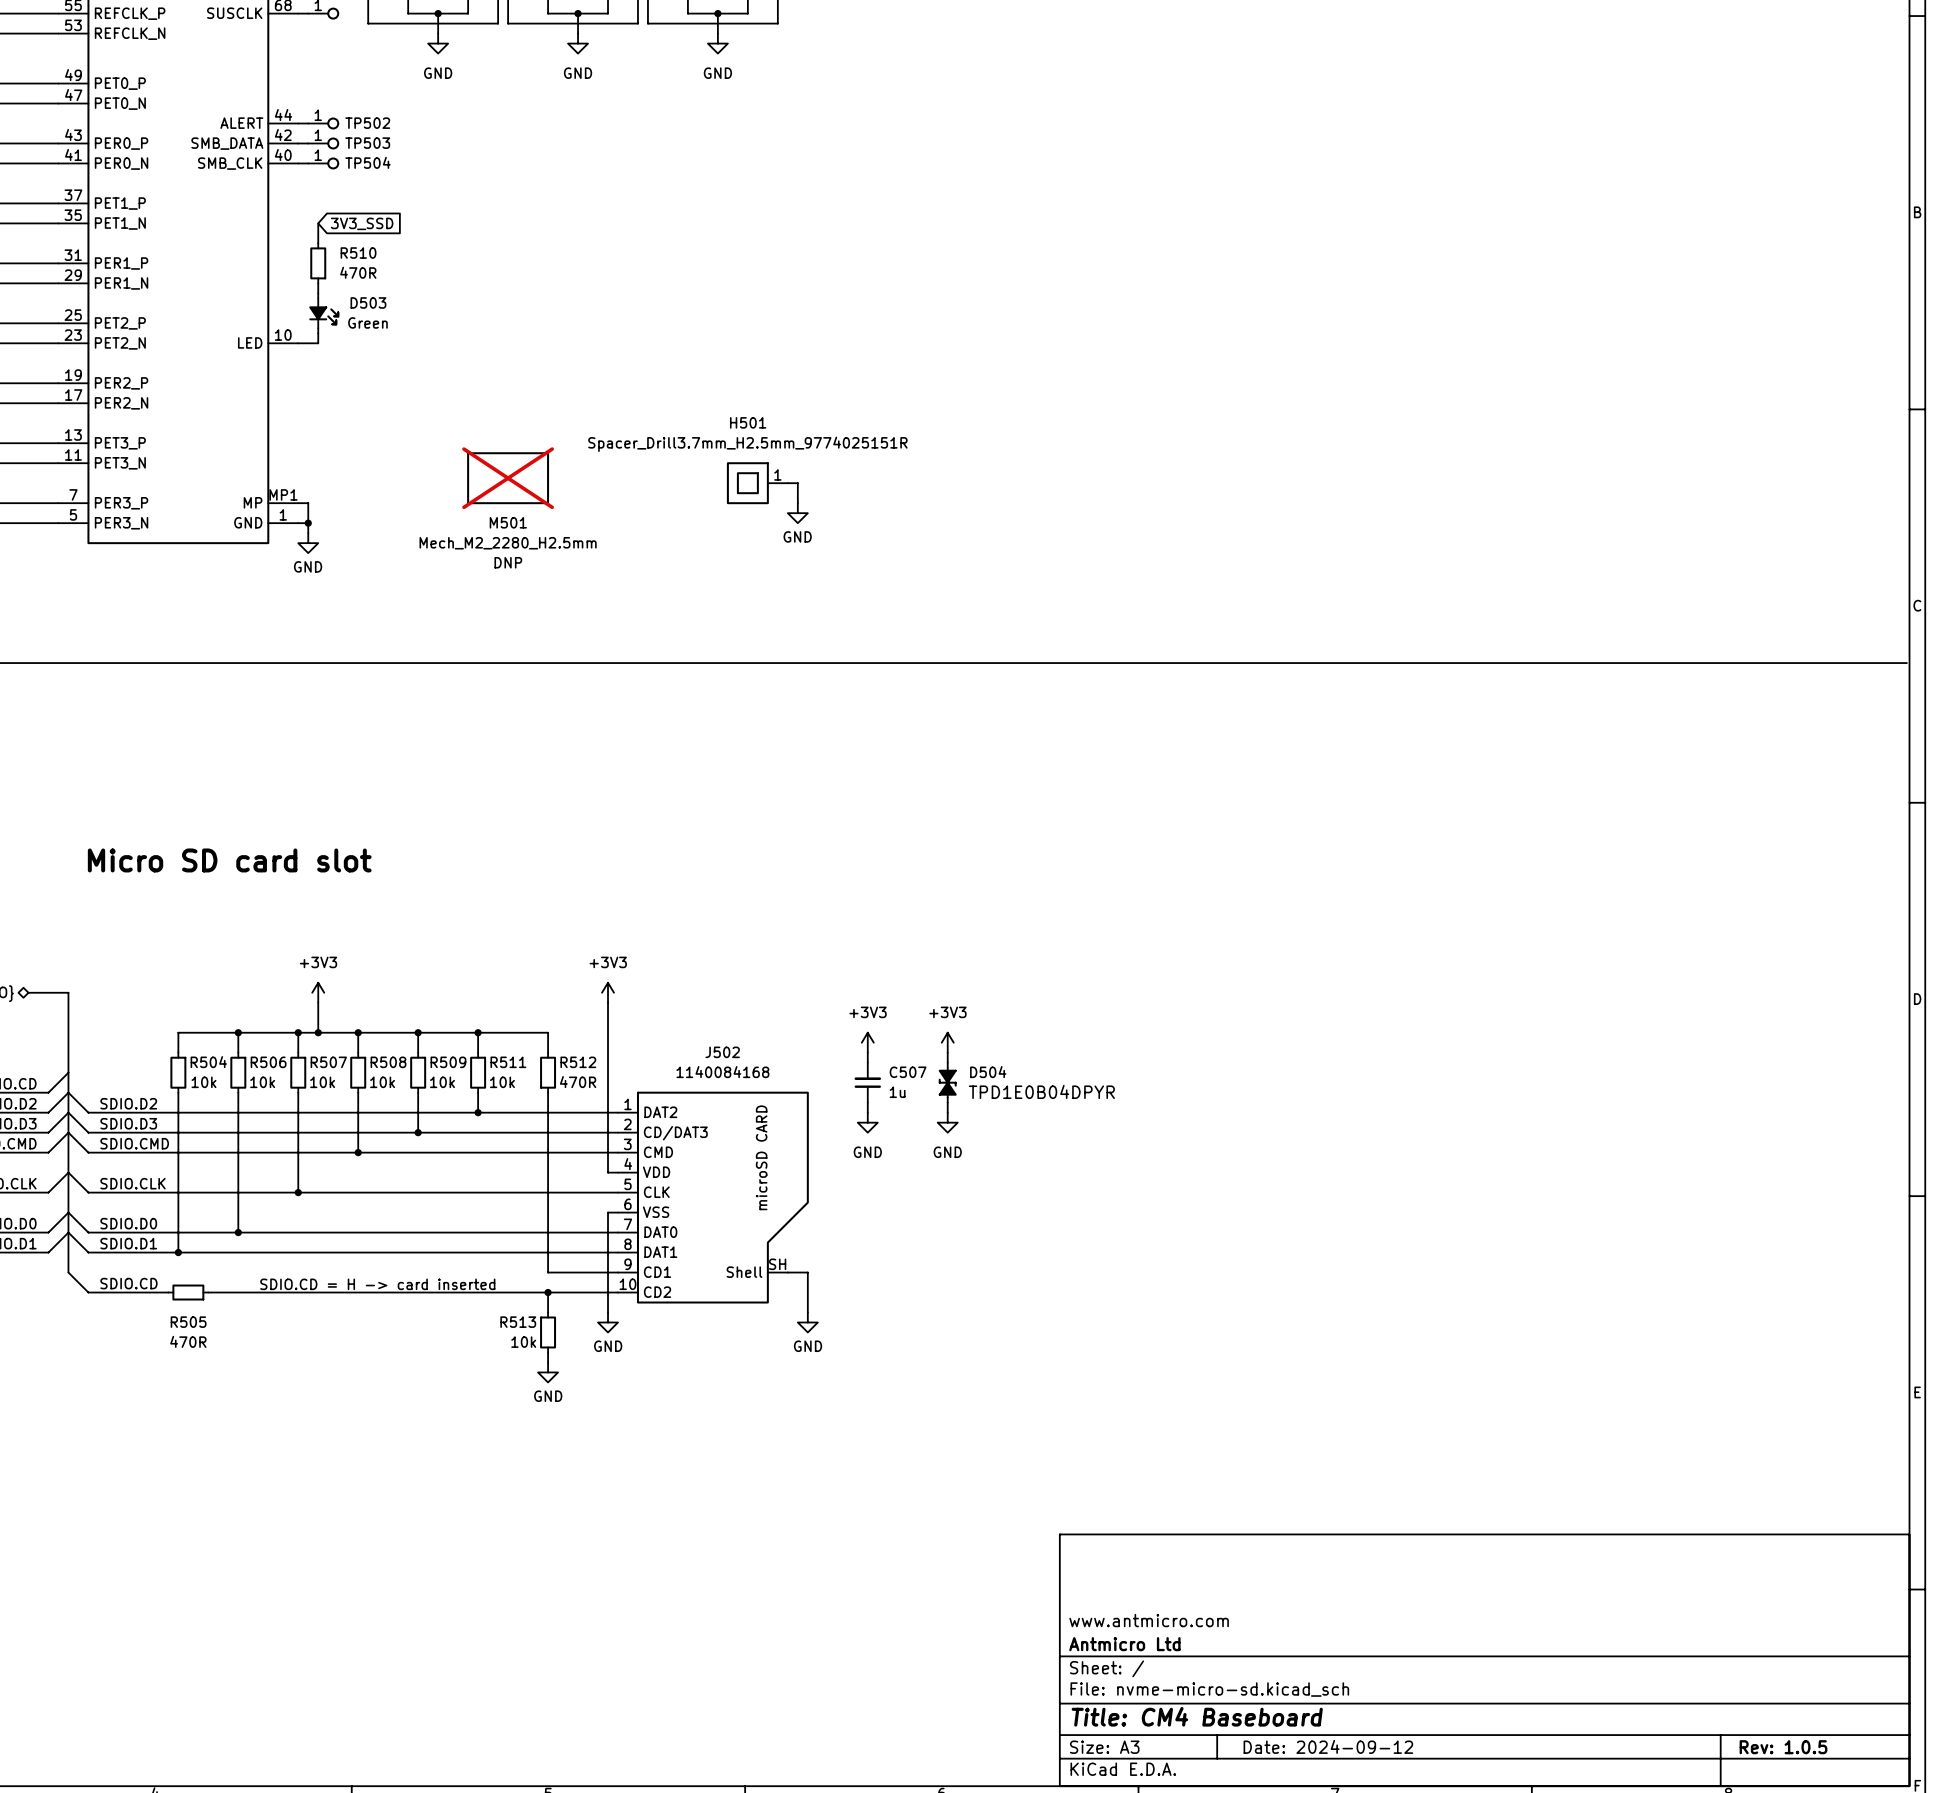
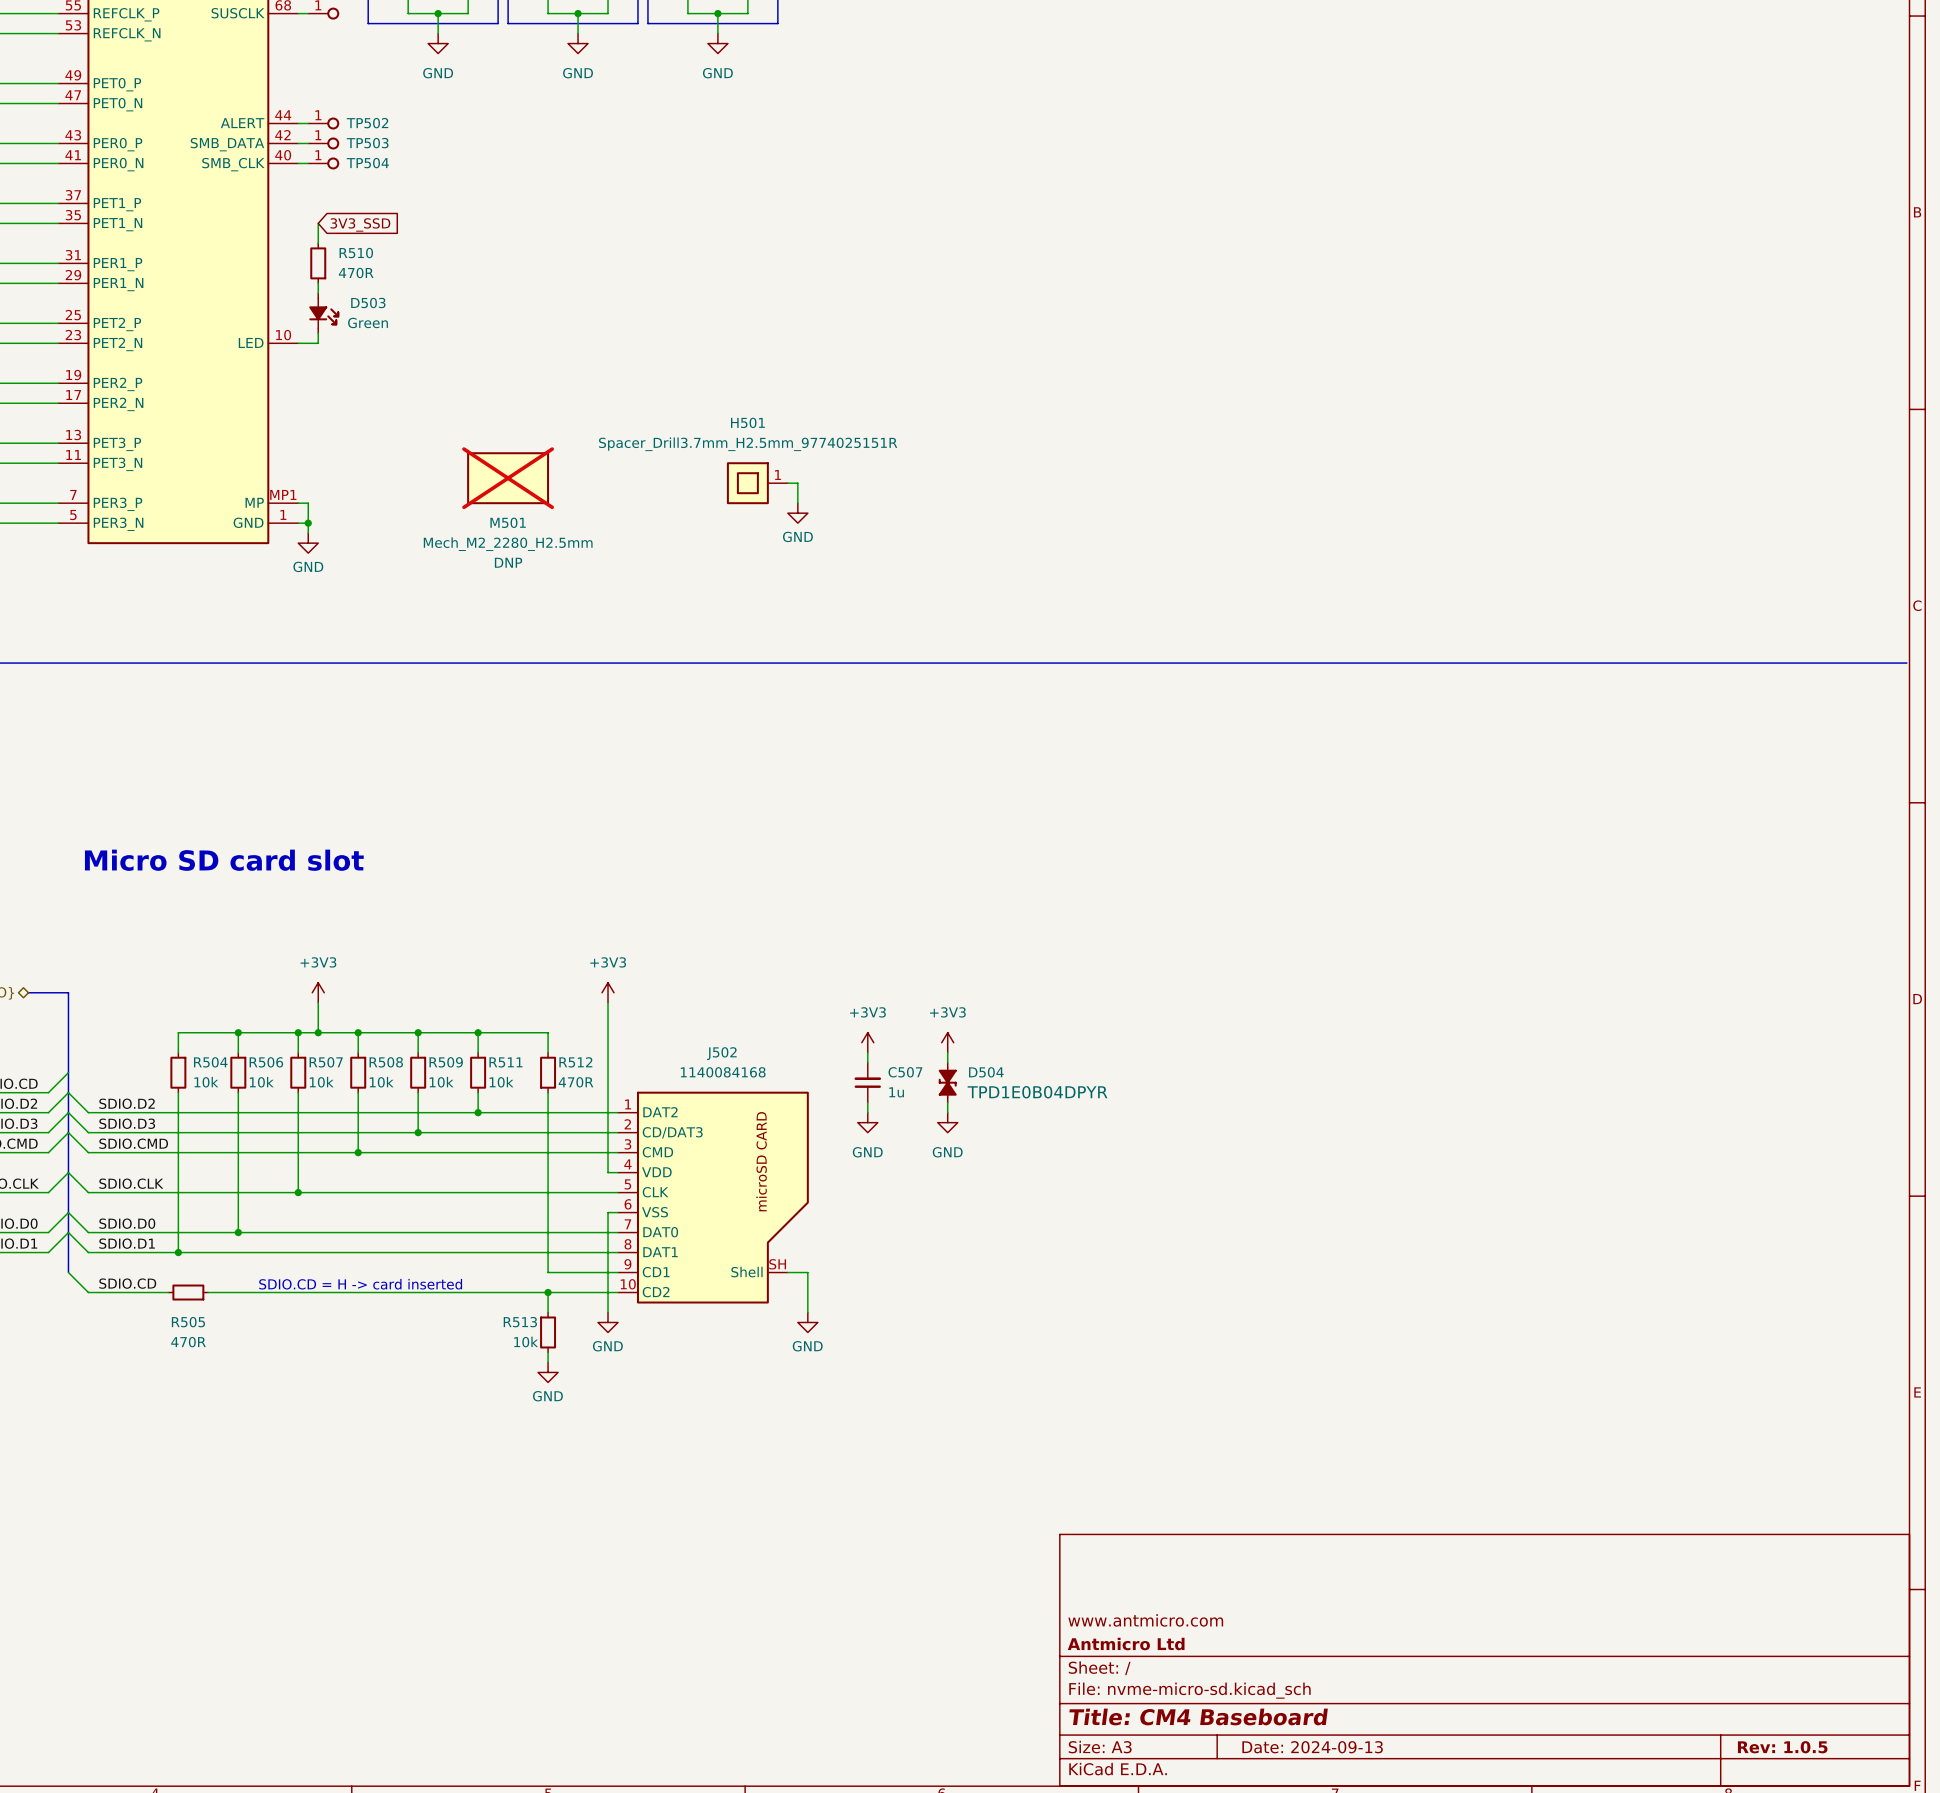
title block: Date: 2024-09-12 (1328, 1746) -> Date: 2024-09-13 (1312, 1747)

